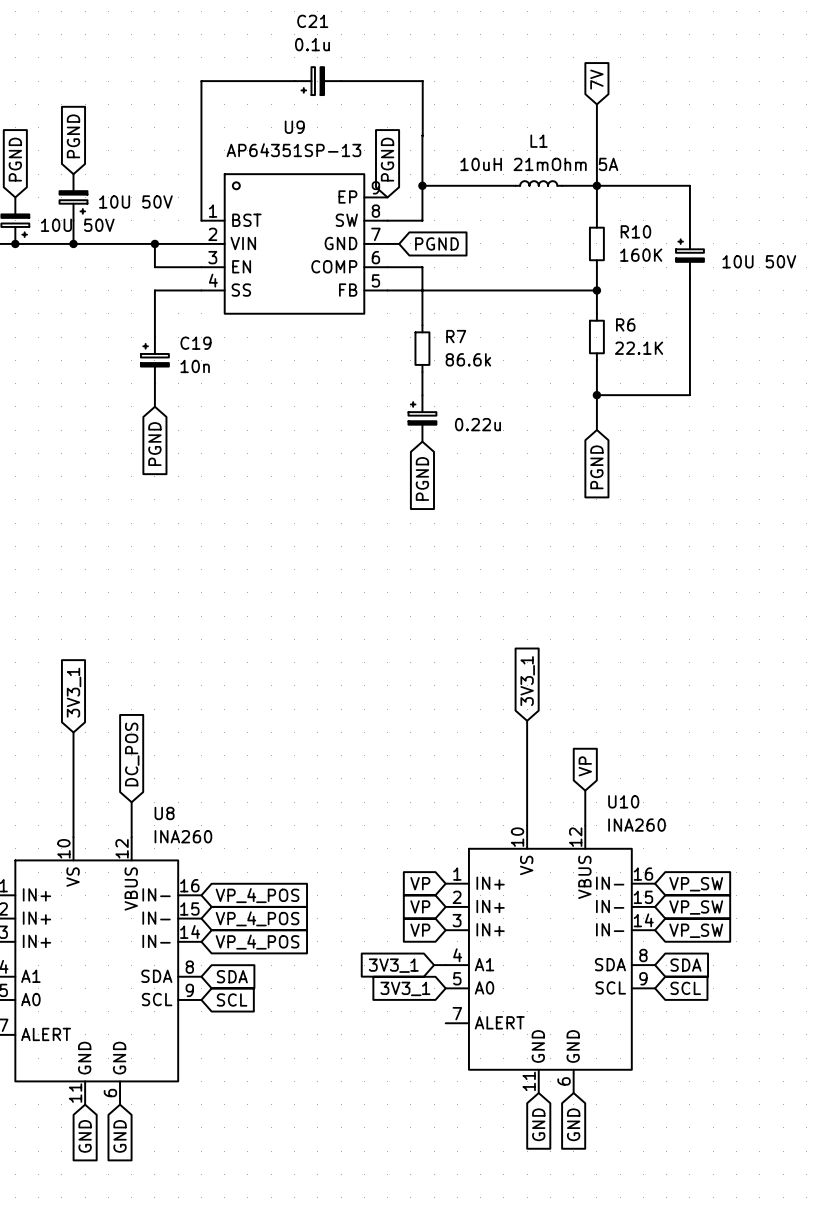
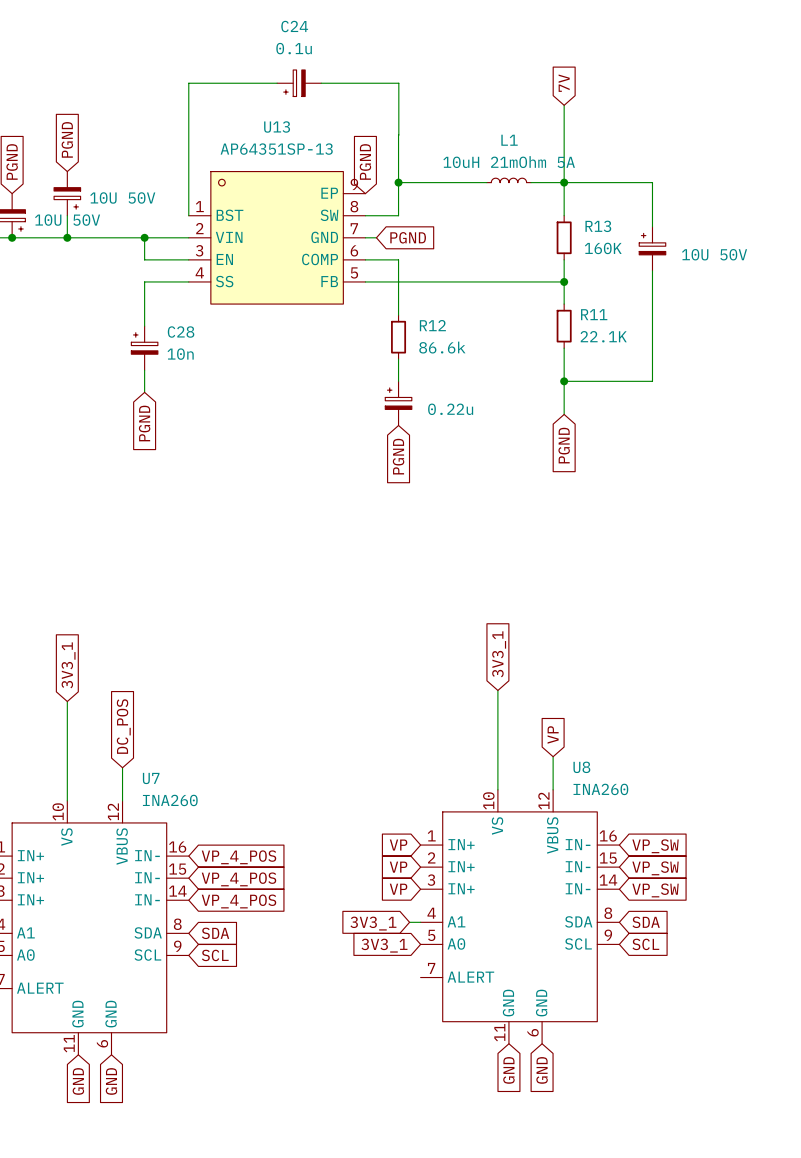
C21 name: C21 (312, 21) -> C24 (294, 26)
U9 name: U9 (294, 127) -> U13 (277, 126)
R10 name: R10 (635, 231) -> R13 (598, 226)
R6 name: R6 (625, 324) -> R11 (594, 314)
R7 name: R7 (456, 336) -> R12 (432, 325)
C19 name: C19 (195, 343) -> C28 (181, 332)
U10 name: U10 (623, 801) -> U8 (581, 767)
U8 name: U8 (164, 813) -> U7 (151, 778)

